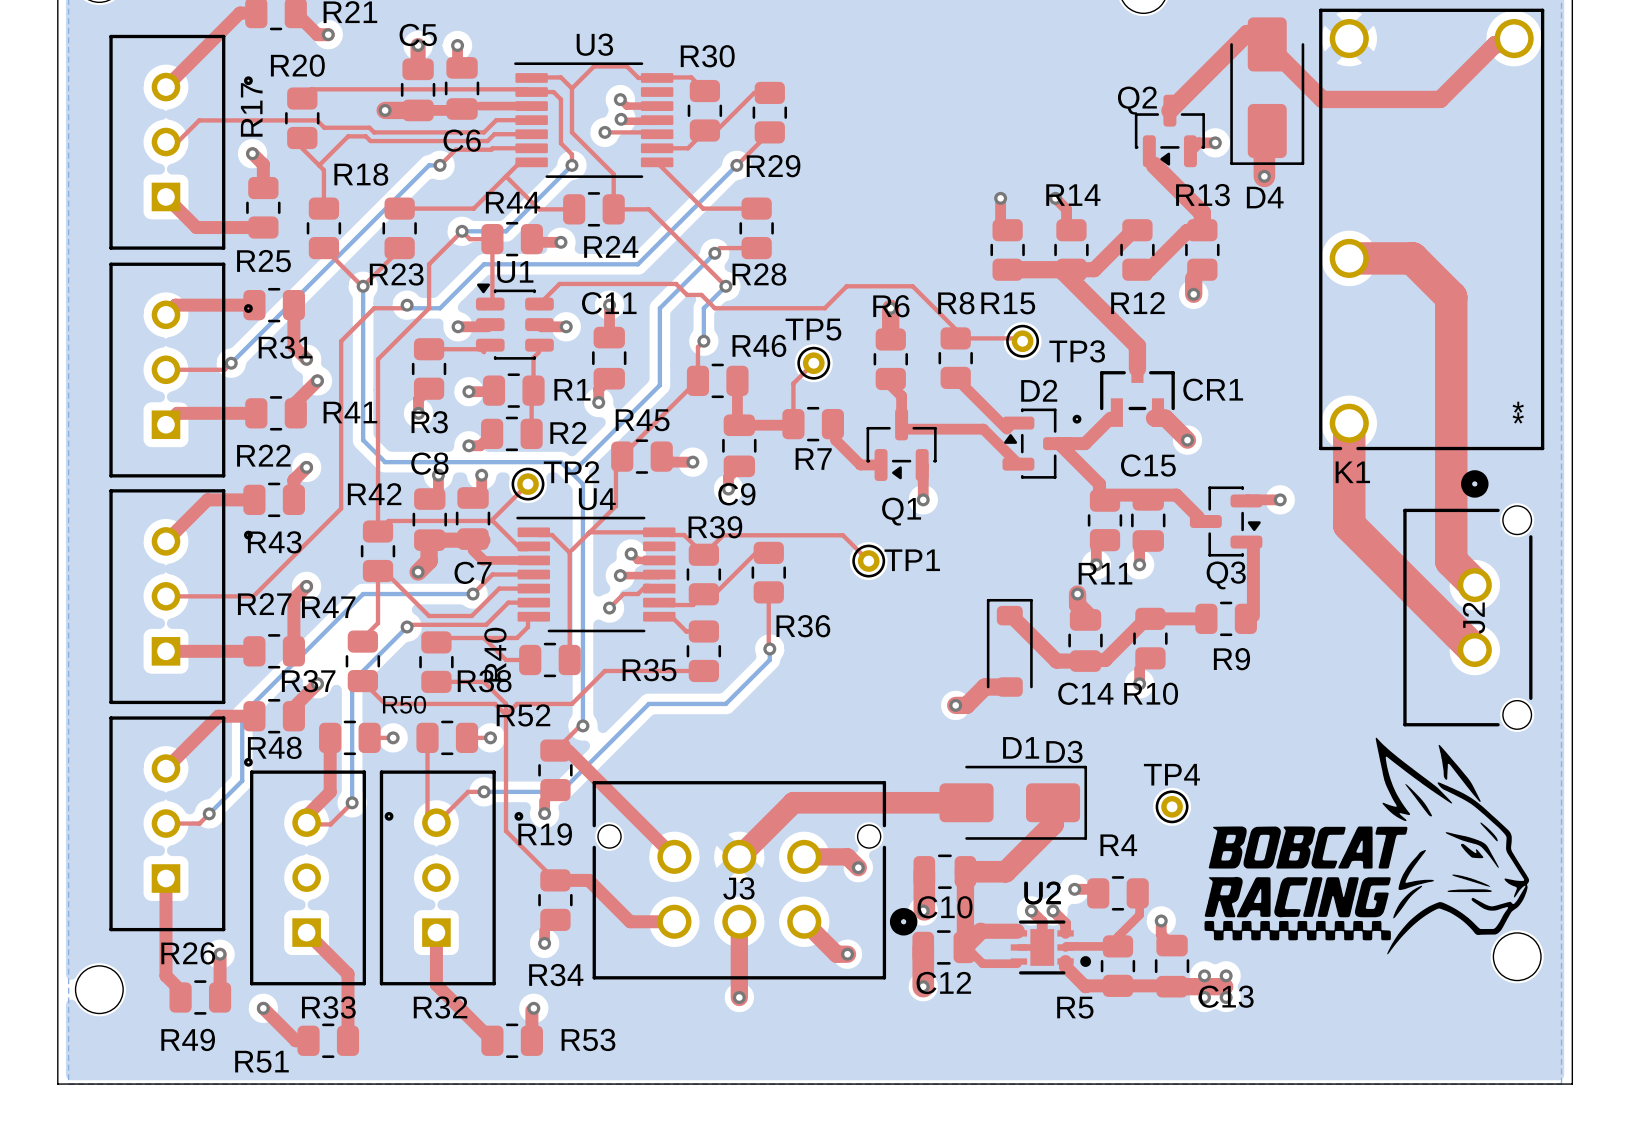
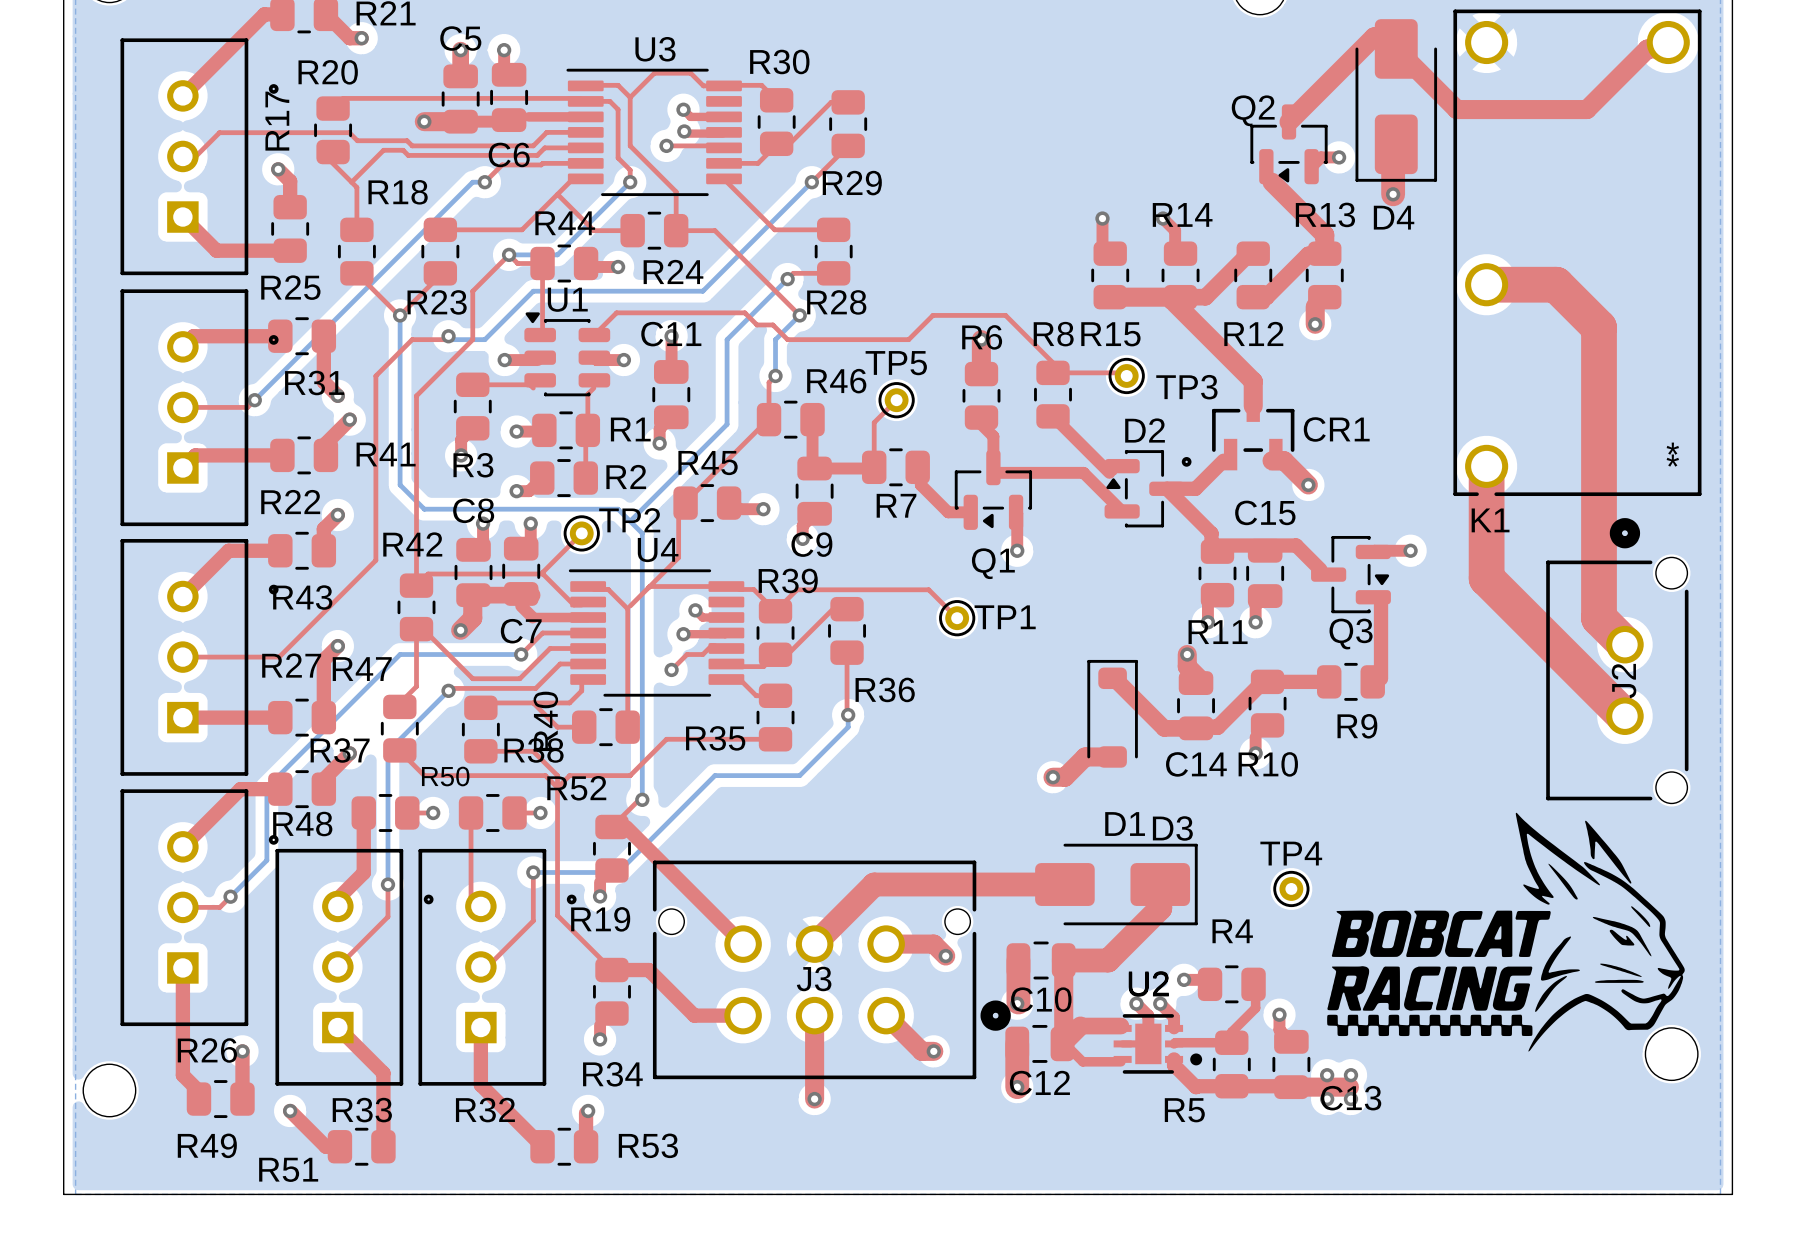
top track: (484, 791) (468, 791) (436, 823) -> (533, 872) (533, 920) (490, 963)
top track: (352, 802) (330, 824) (306, 824) -> (387, 884) (387, 916) (337, 966)

